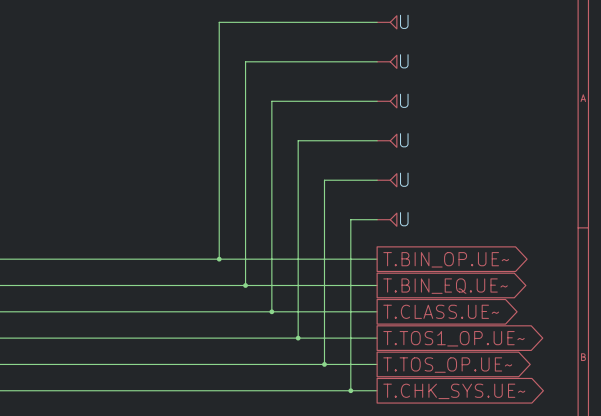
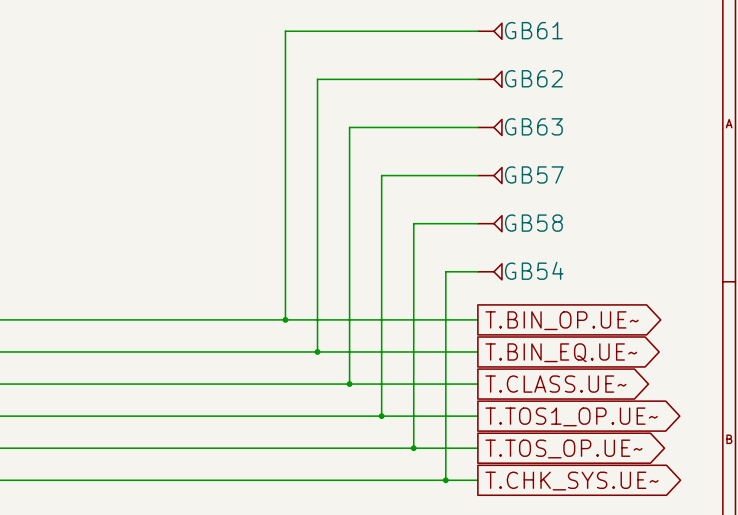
U name: U (404, 21) -> GB61 (533, 30)
U name: U (404, 61) -> GB62 (533, 78)
U name: U (404, 100) -> GB63 (533, 126)
U name: U (404, 140) -> GB57 (534, 174)
U name: U (404, 179) -> GB58 (533, 223)
U name: U (404, 219) -> GB54 (534, 270)

